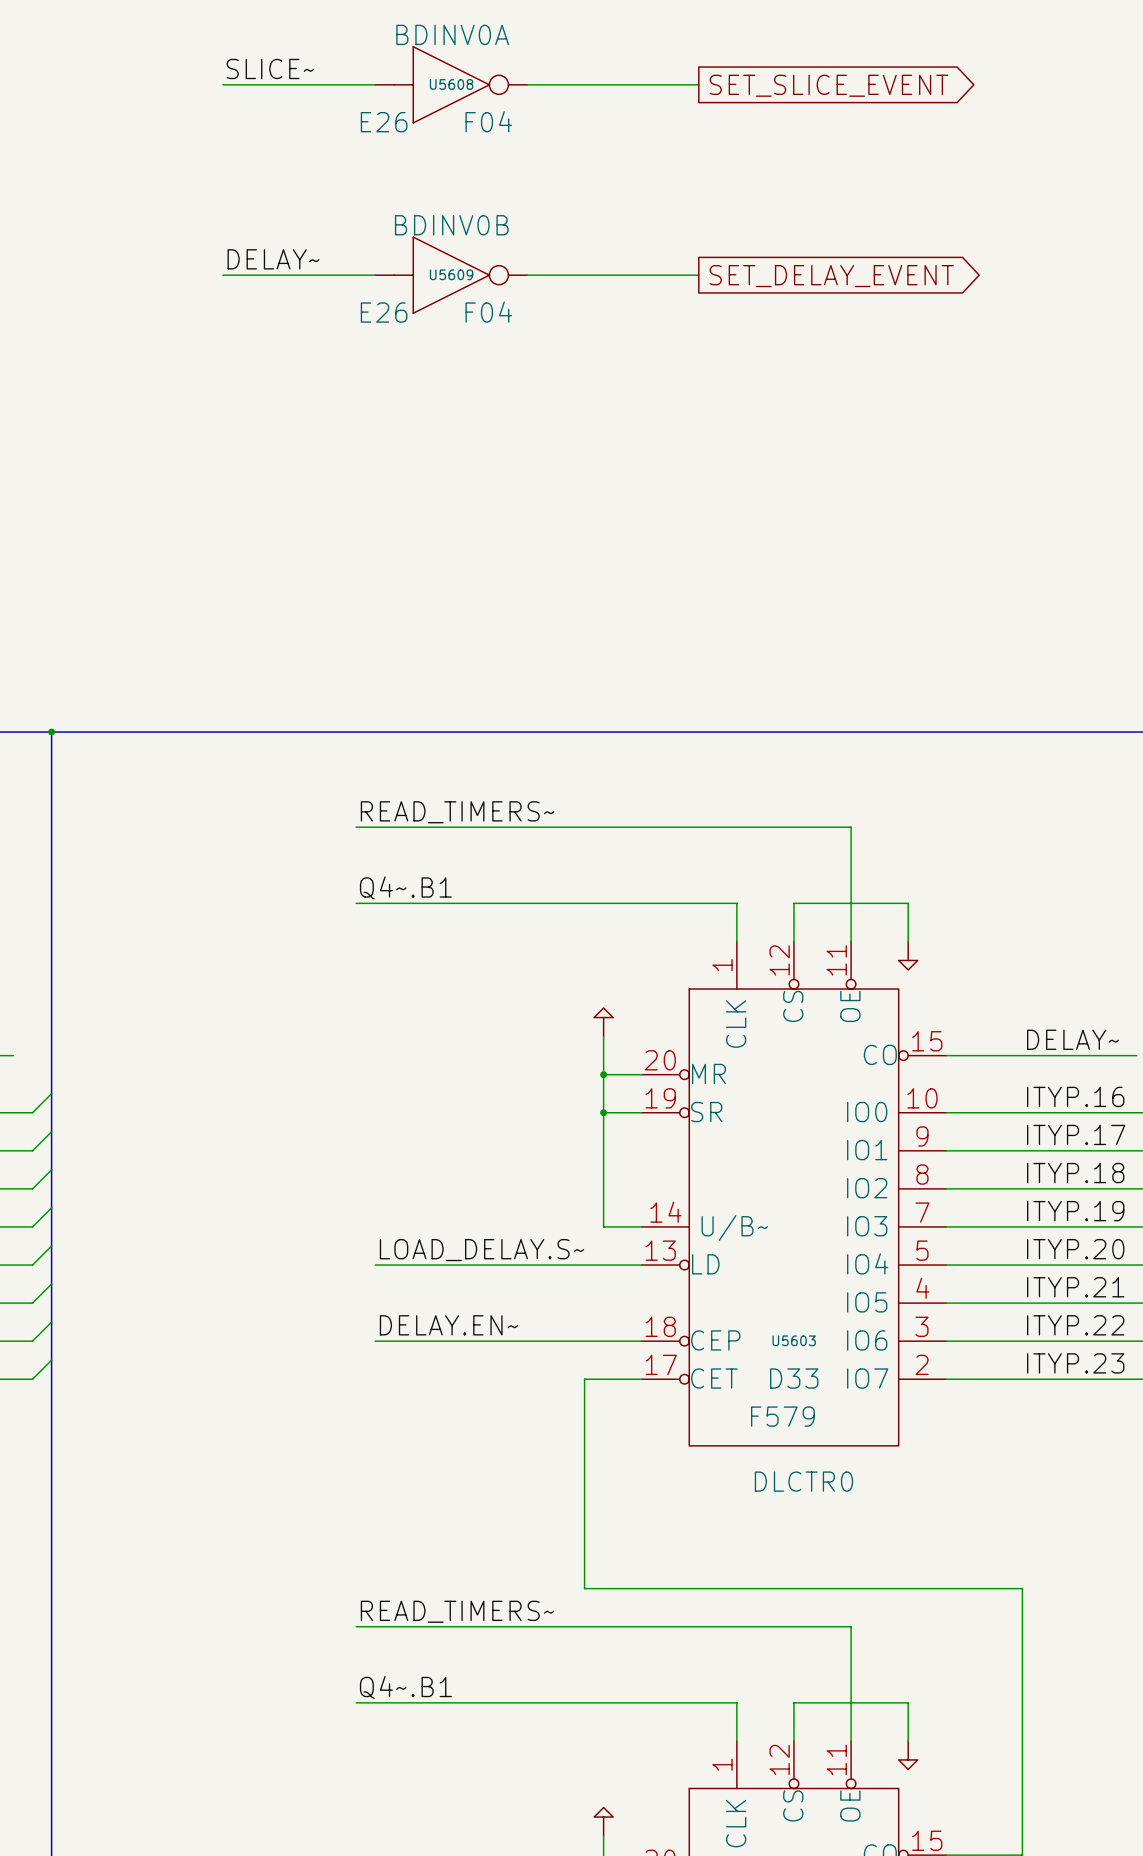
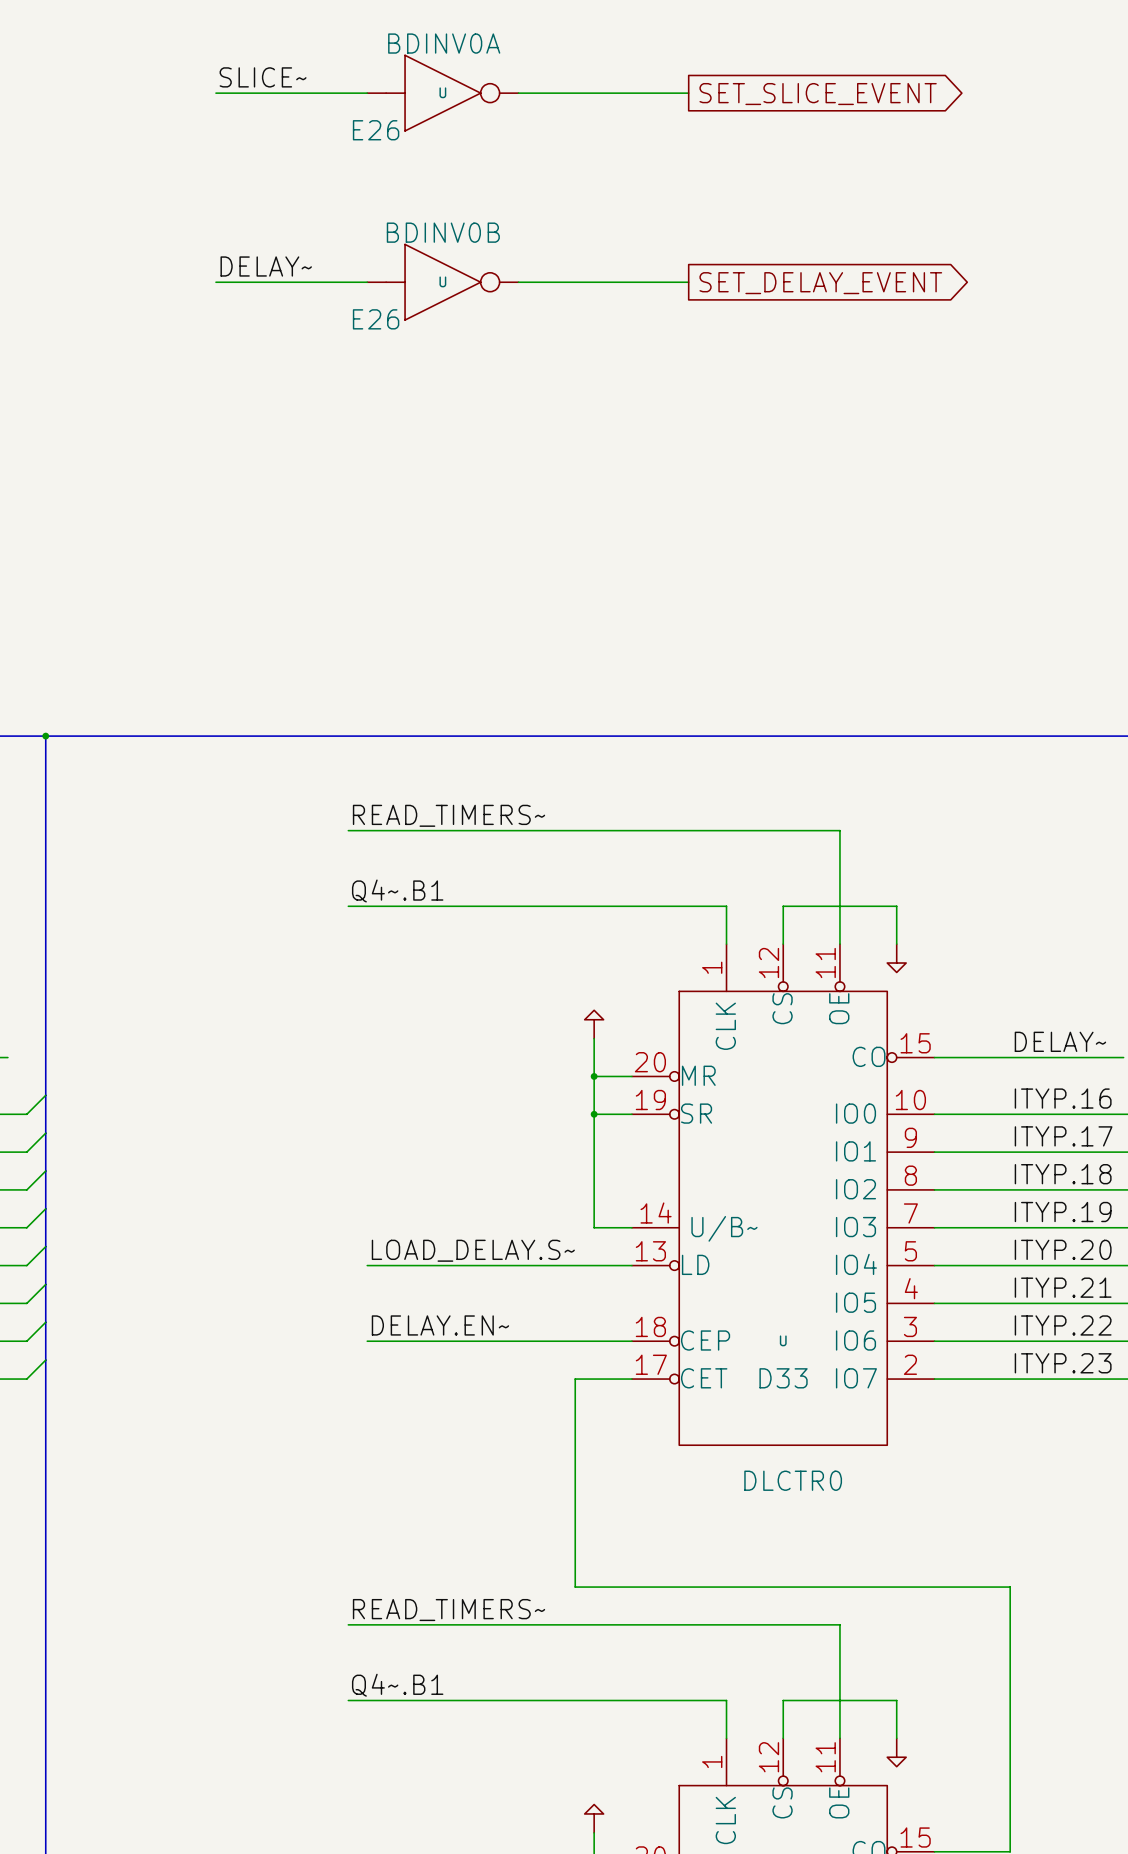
U5608 name: U5608 (451, 84) -> U (442, 92)
U5608 value: F04 (488, 121) -> none
U5609 name: U5609 (451, 274) -> U (442, 281)
U5609 value: F04 (488, 312) -> none
U5603 name: U5603 (794, 1340) -> U (783, 1340)
U5603 value: F579 (782, 1416) -> none

